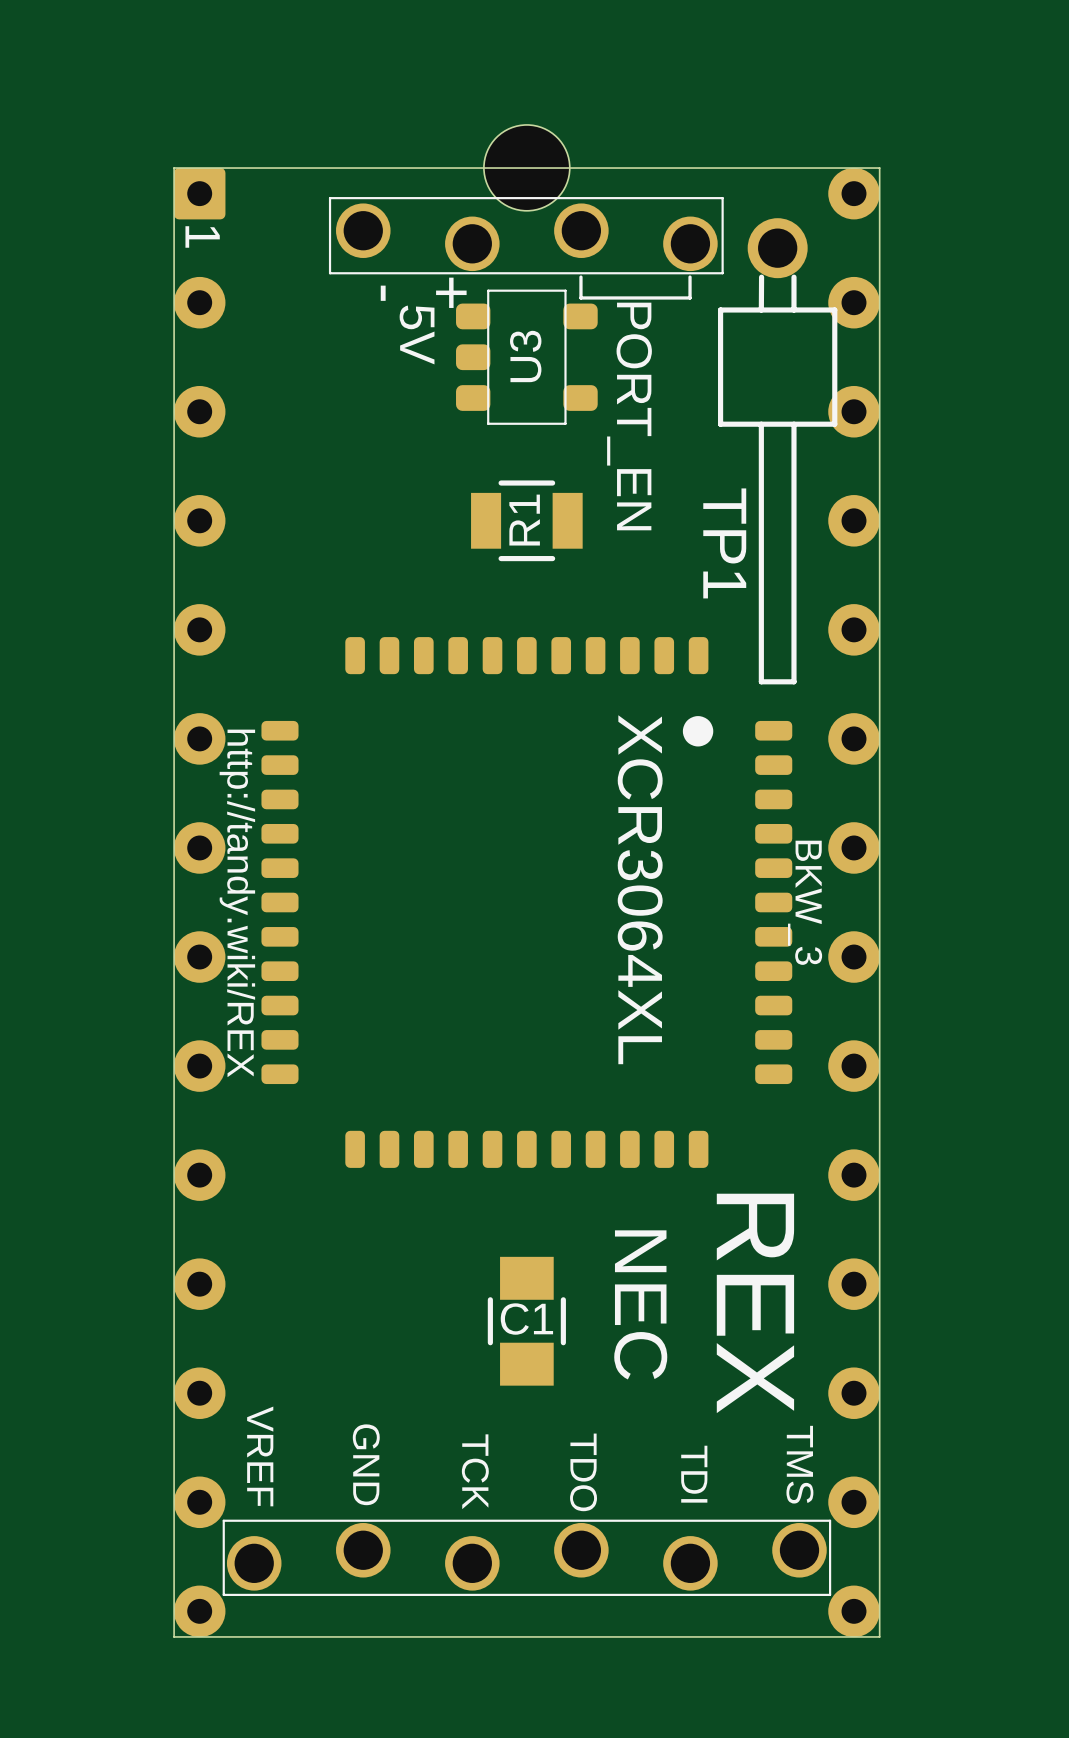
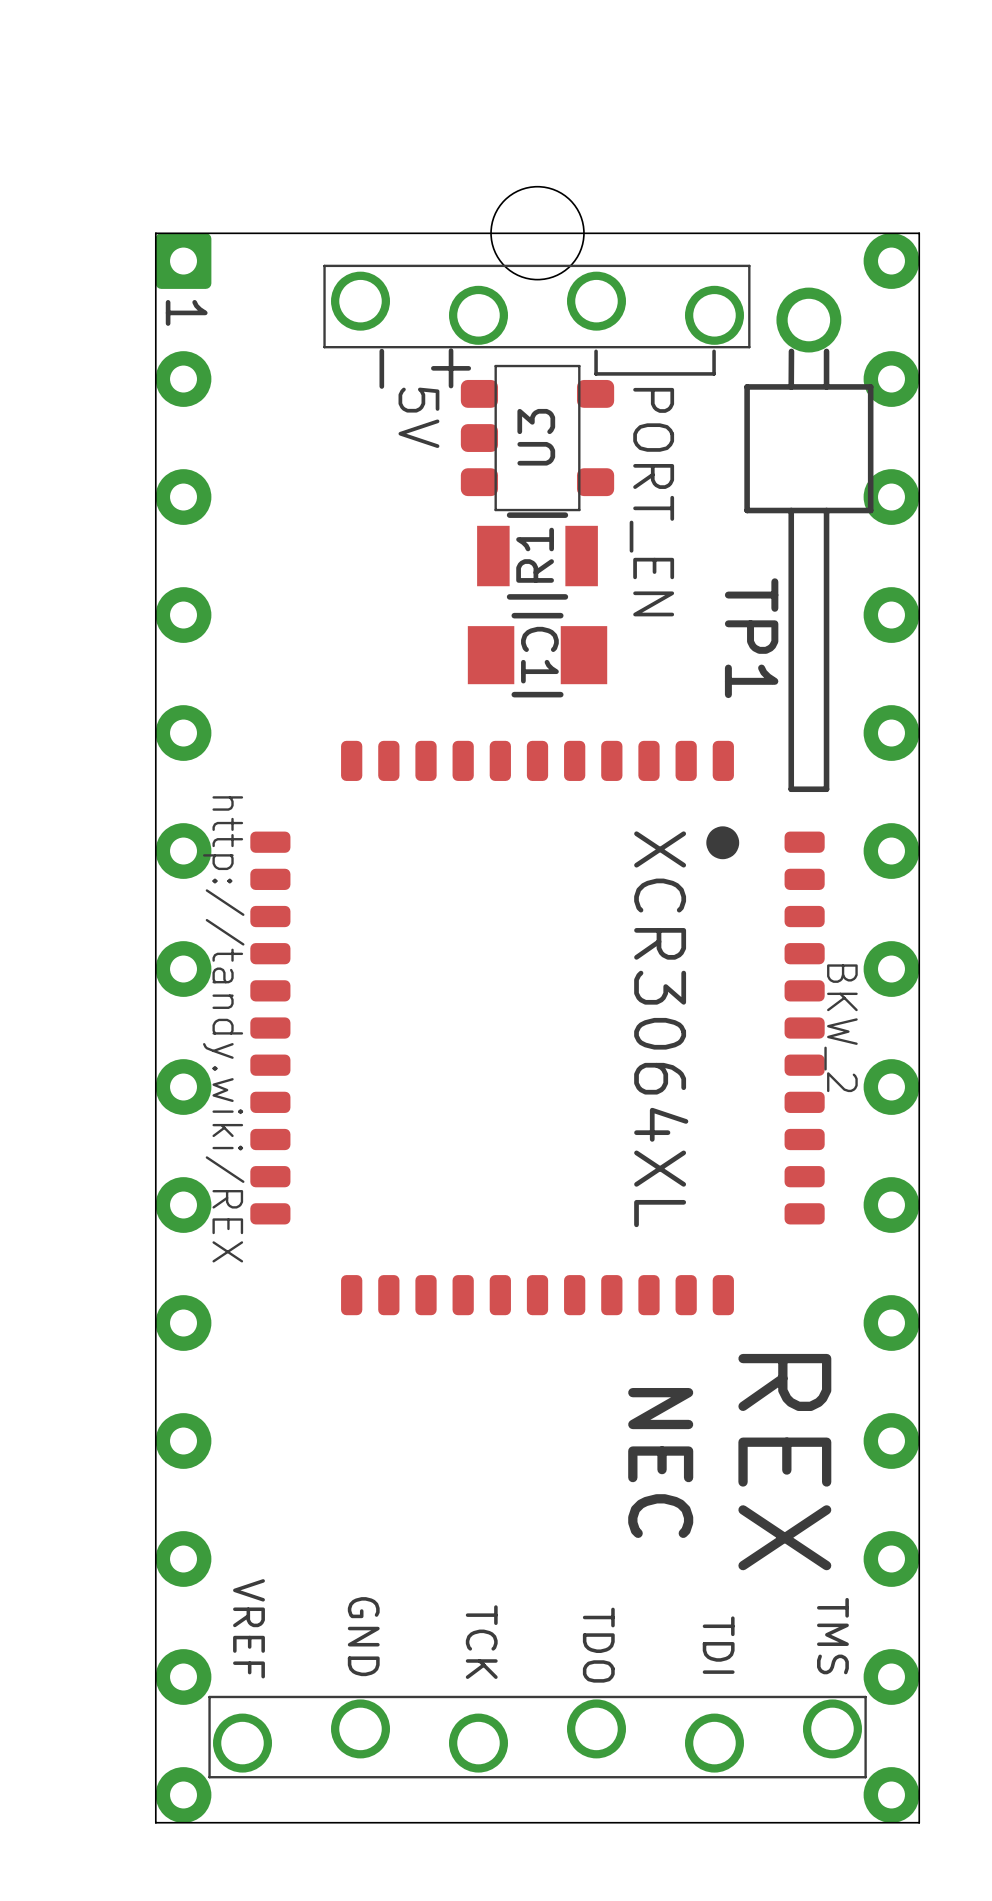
R1 position: (526, 520) -> (537, 556)
text: BKW_3 (805, 902) -> BKW_2 (841, 1028)
C1 rotation: 0° (526, 1321) -> 90° clockwise (537, 655)
C1 position: (526, 1321) -> (537, 655)

